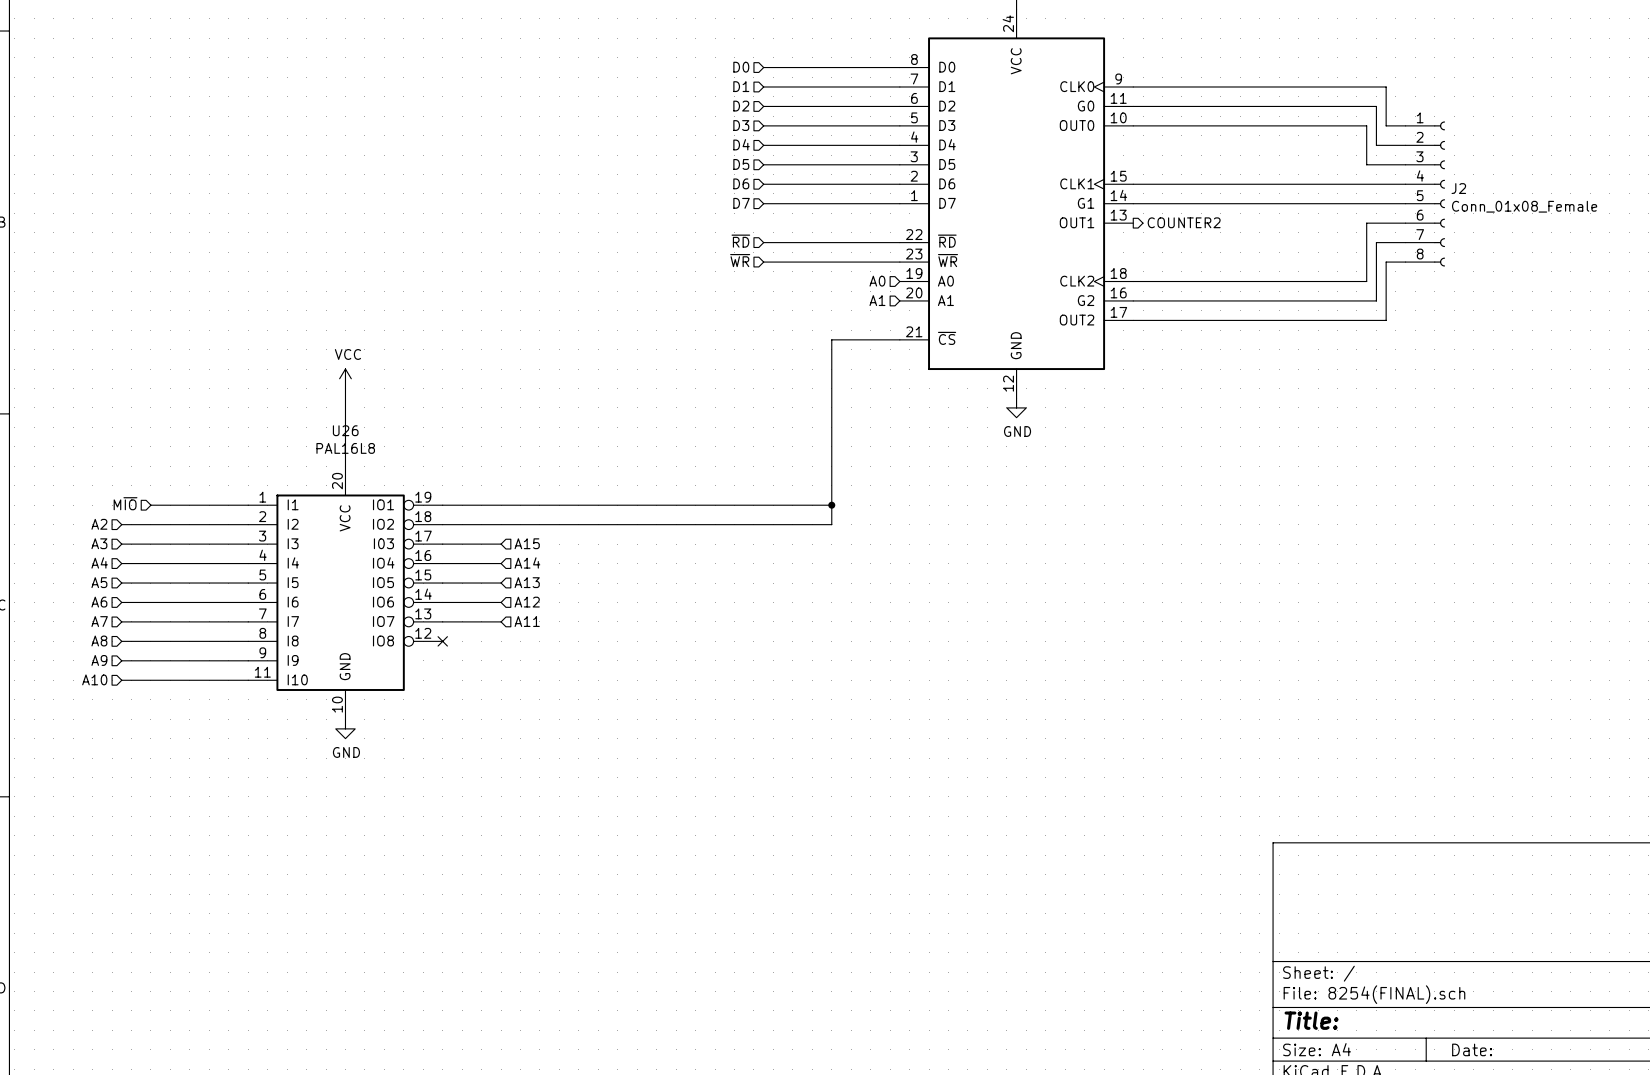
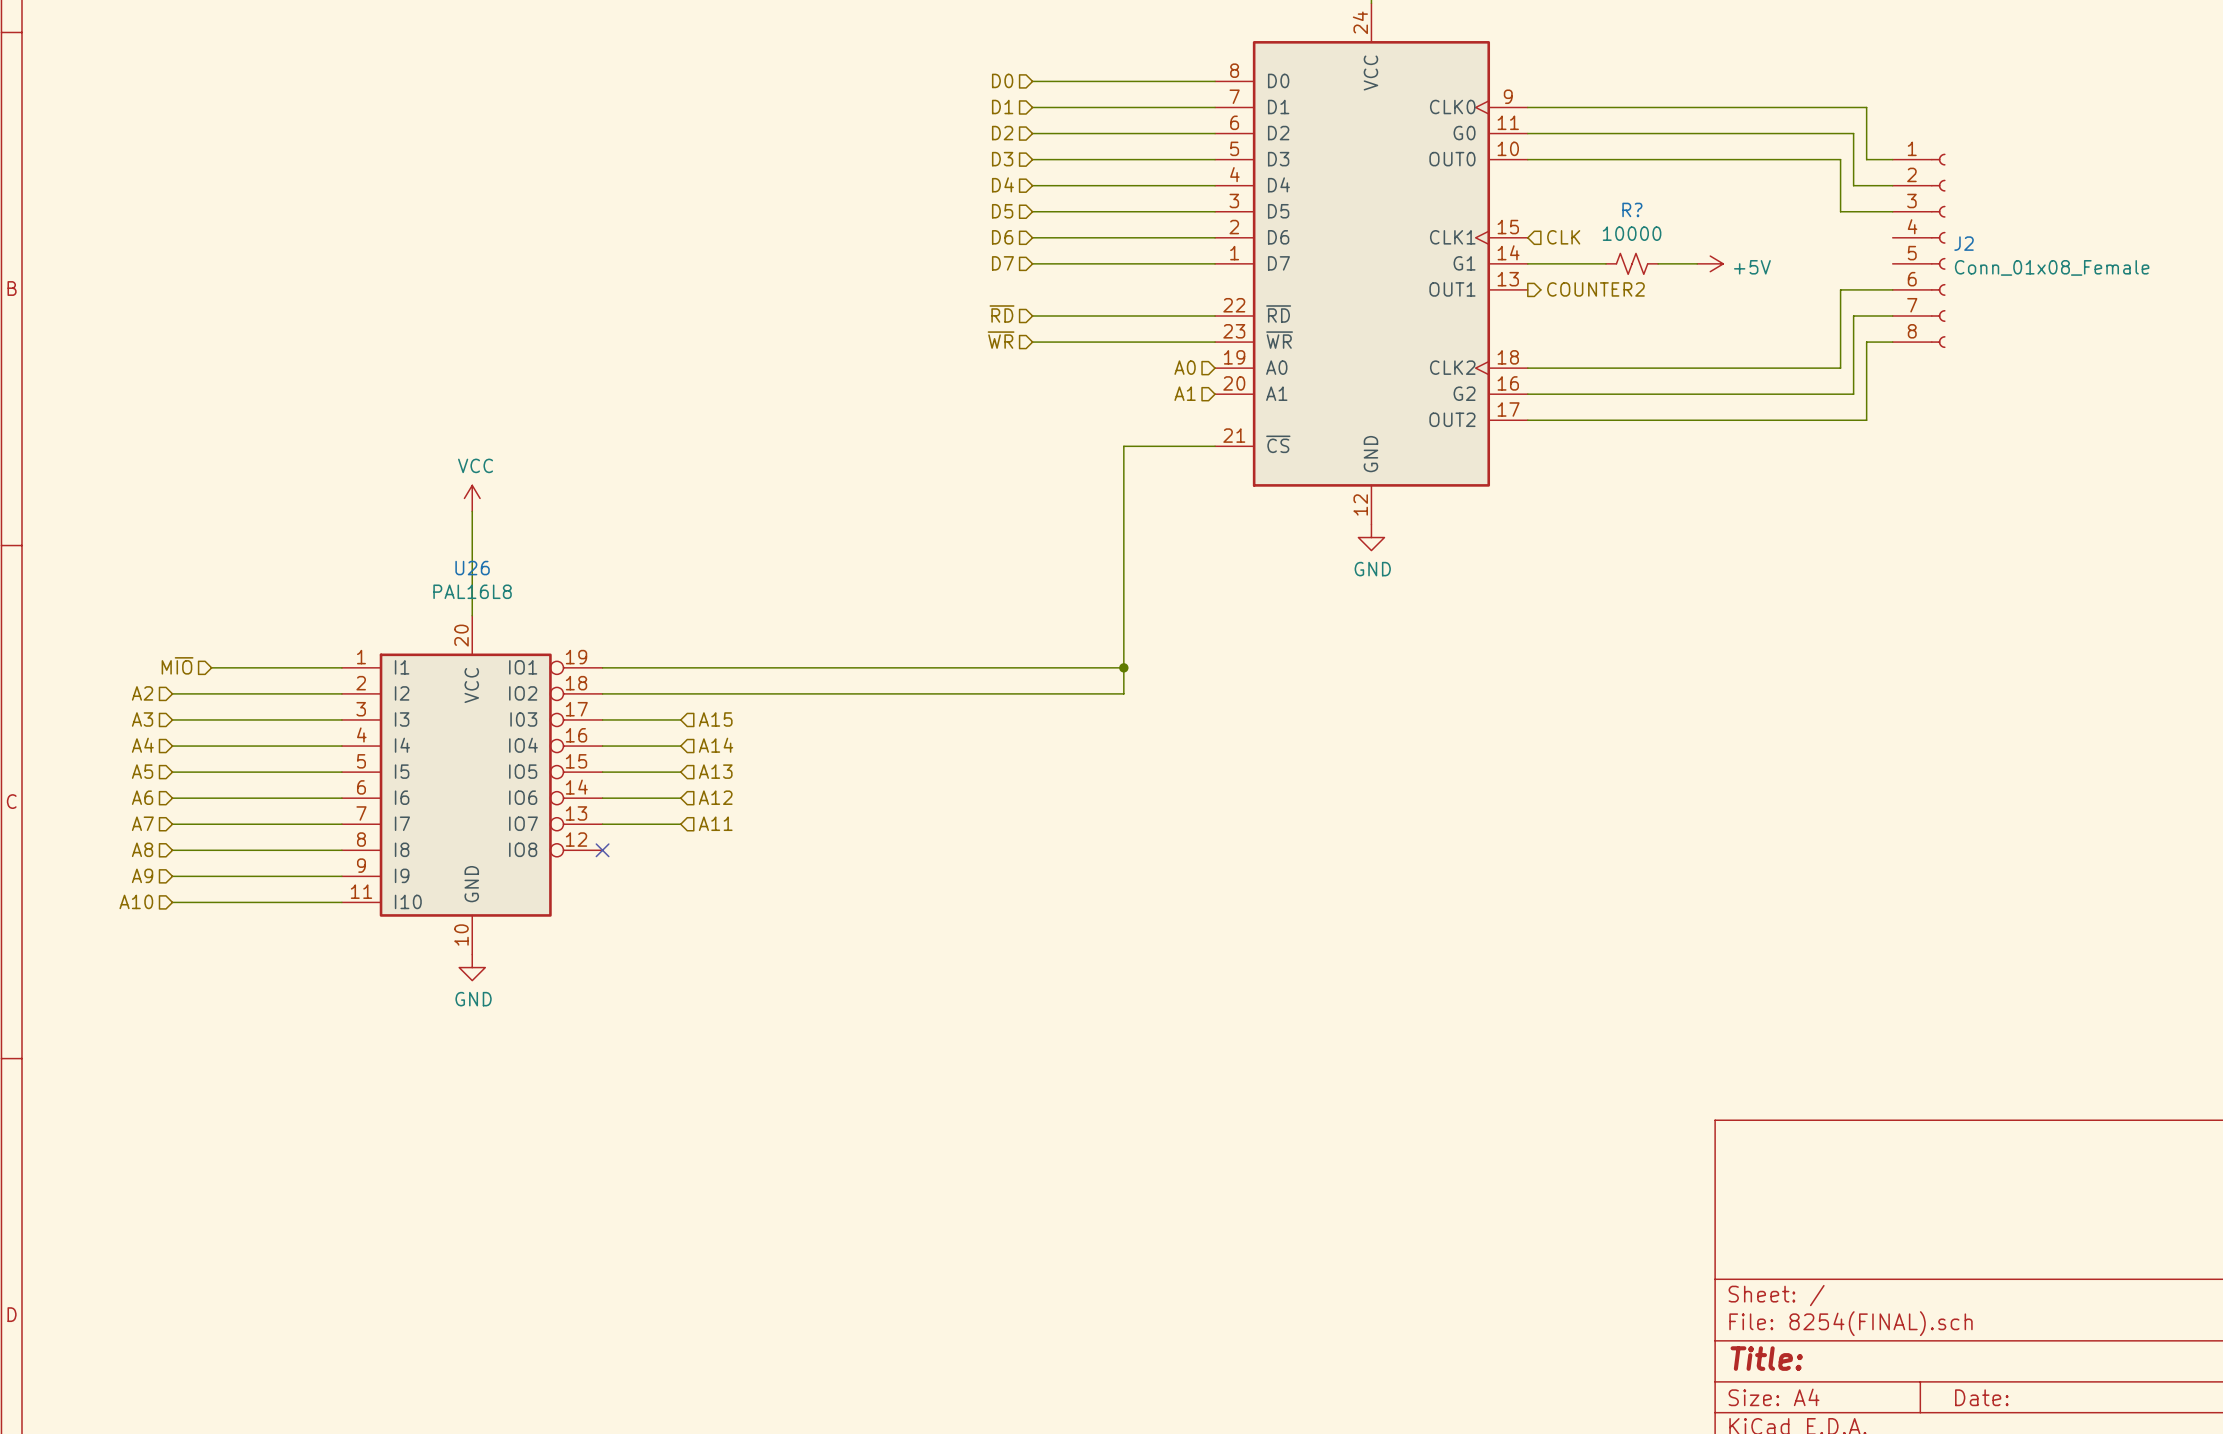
hierarchical label: none -> CLK (1563, 237)
wire: (1133, 184) (1405, 184) -> none
R?: none -> 10000 (1632, 263)
wire: (1259, 203) (1405, 203) -> none
power symbol: none -> +5V (1710, 263)

